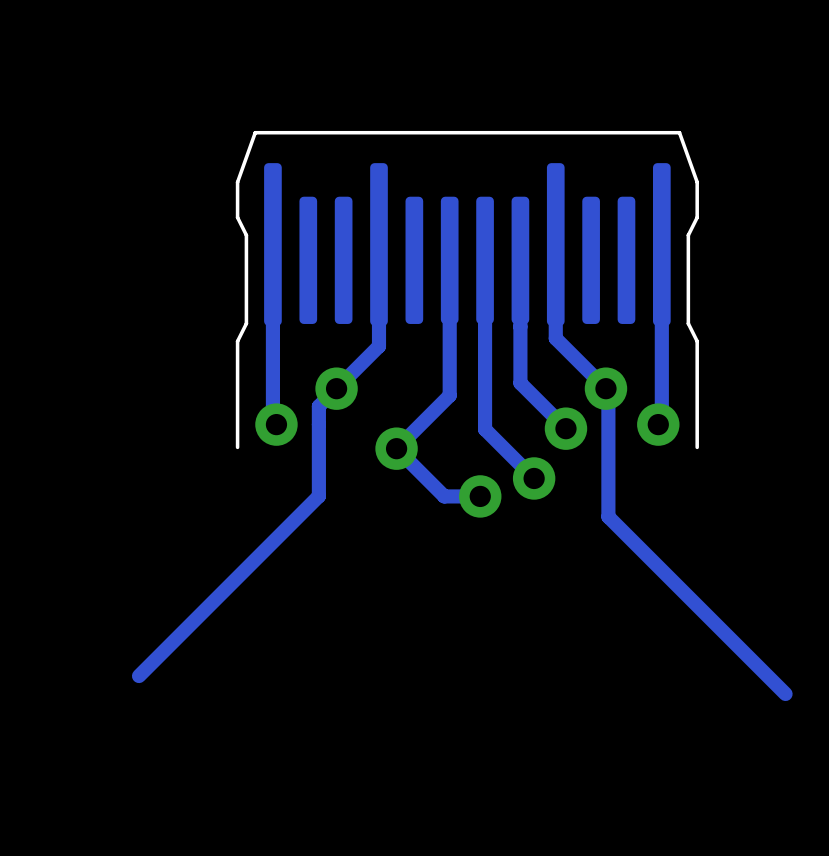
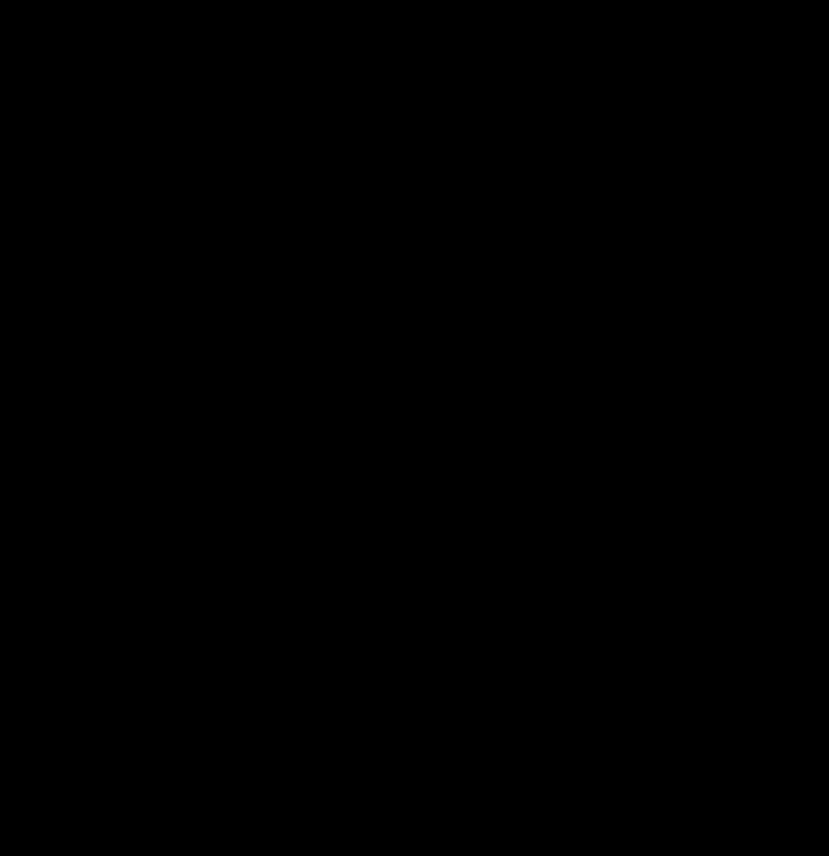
track: (272, 244) (272, 421) (276, 424) -> none
track: (378, 244) (378, 346) (318, 406) (318, 496) (139, 676) -> none
track: (555, 244) (555, 338) (608, 391) (608, 516) (785, 693) -> none
track: (661, 244) (661, 421) (658, 424) -> none
track: (449, 260) (449, 395) (396, 448) (444, 496) (480, 496) -> none
track: (485, 260) (485, 429) (534, 478) -> none
track: (520, 260) (520, 383) (565, 428) -> none
part: (467, 290) -> none
via: (336, 388) -> none
via: (605, 388) -> none
via: (276, 424) -> none
via: (658, 424) -> none
via: (565, 428) -> none
via: (396, 448) -> none
via: (534, 478) -> none
via: (480, 496) -> none

